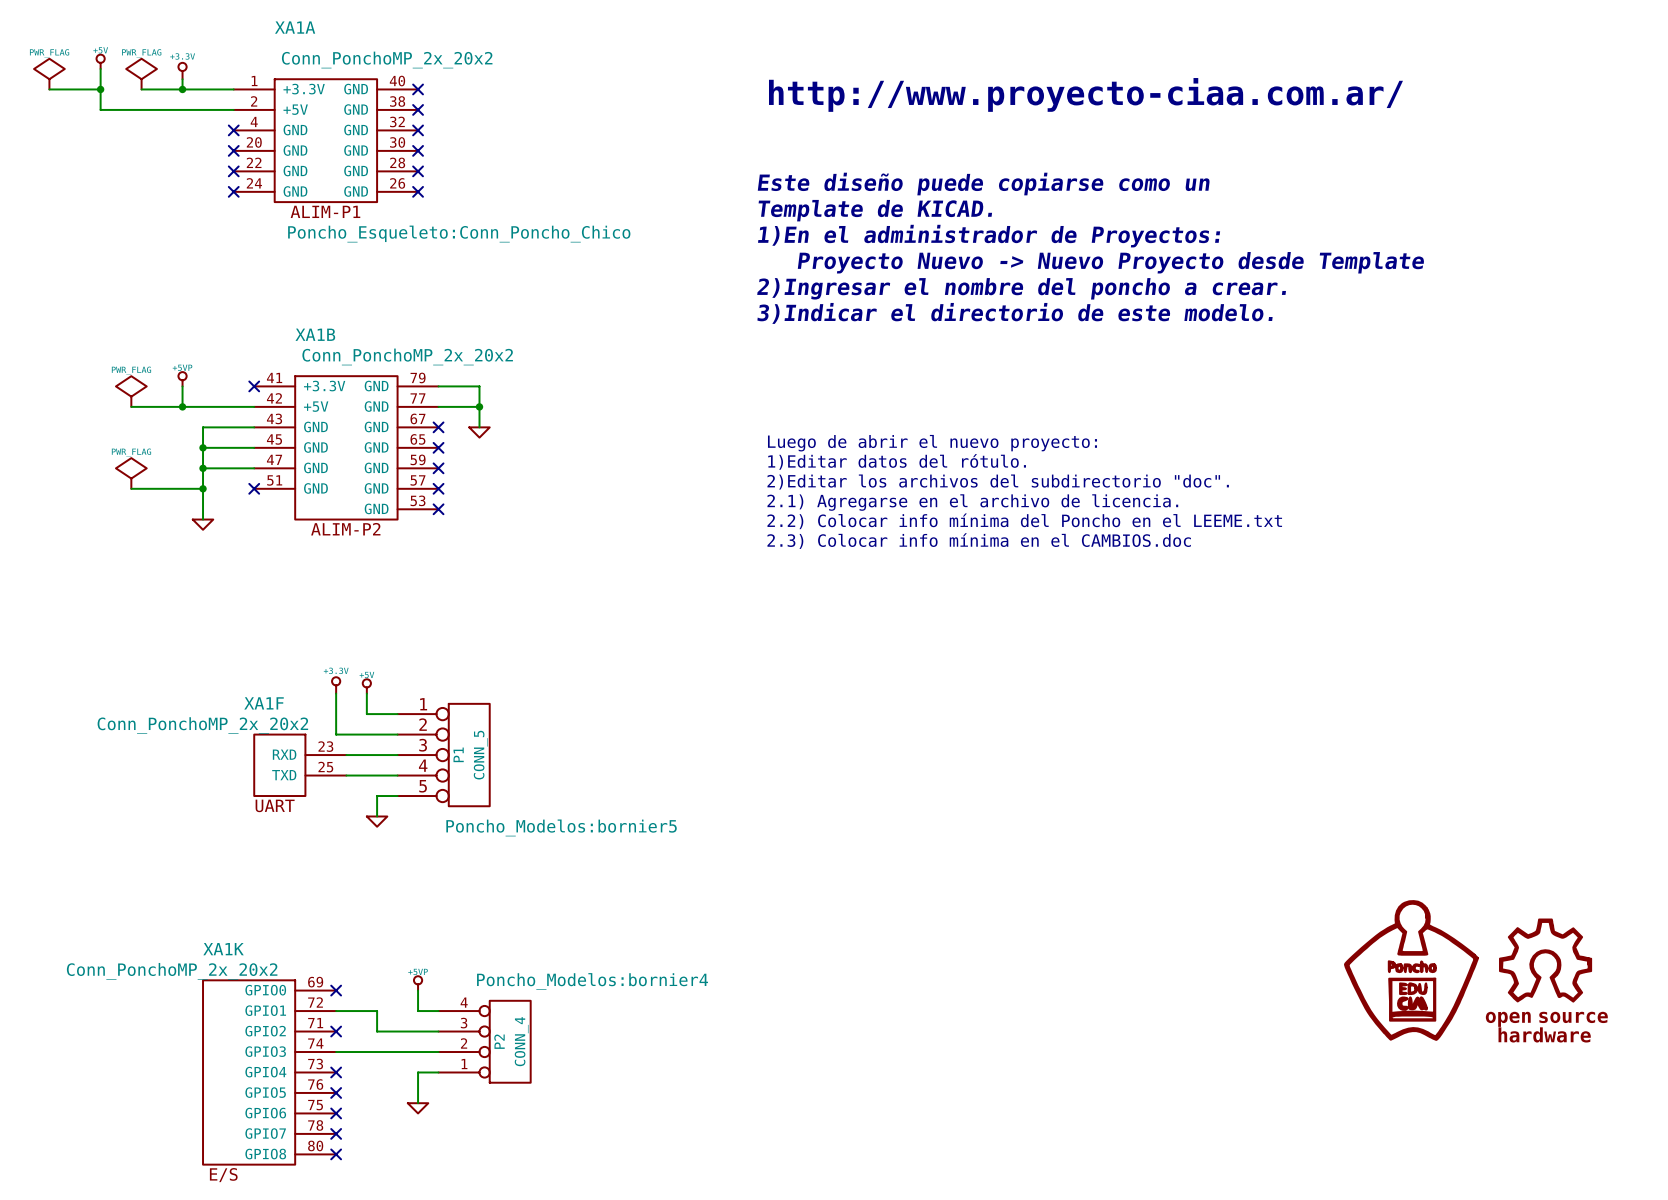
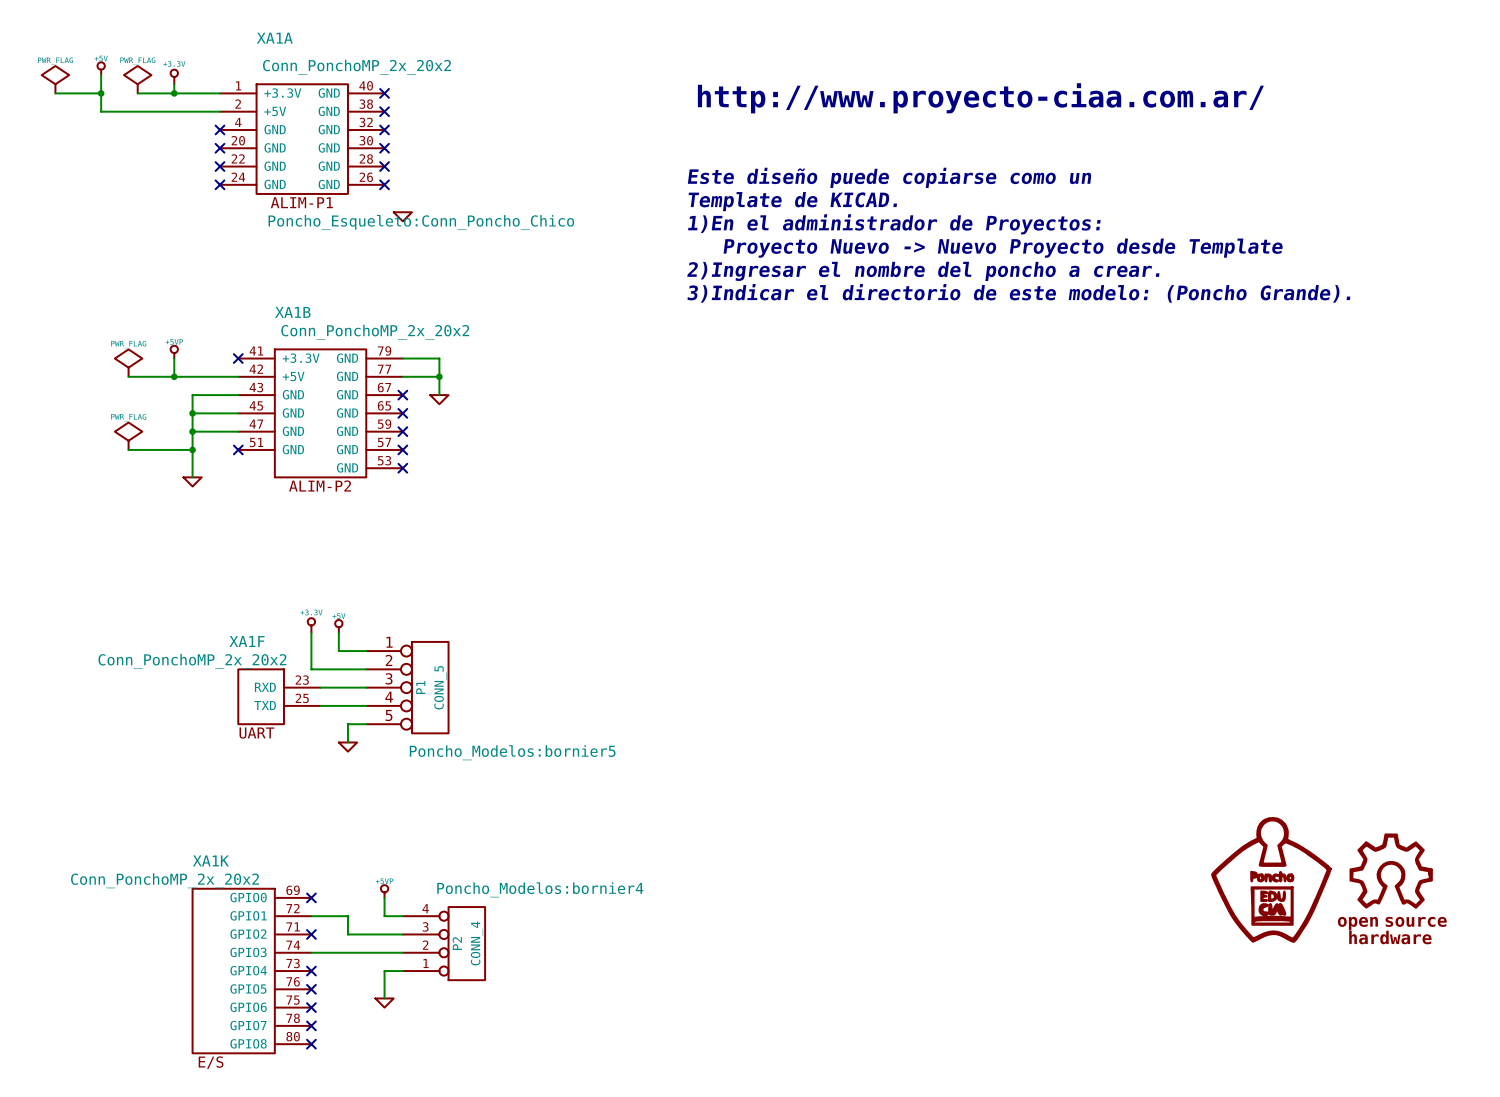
power symbol: none -> (402, 216)
text: 3)Indicar el directorio de este modelo. (1015, 313) -> 3)Indicar el directorio de este modelo: (Poncho Grande). (1018, 293)
text: Luego de abrir el nuevo proyecto: (932, 443) -> none
text: 1)Editar datos del rótulo. (897, 461) -> none
text: 2)Editar los archivos del subdirectorio "doc". (998, 482) -> none
text: 2.1) Agregarse en el archivo de licencia. (972, 502) -> none
text: 2.2) Colocar info mínima del Poncho en el LEEME.txt (1024, 521) -> none
text: 2.3) Colocar info mínima en el CAMBIOS.doc (979, 541) -> none

